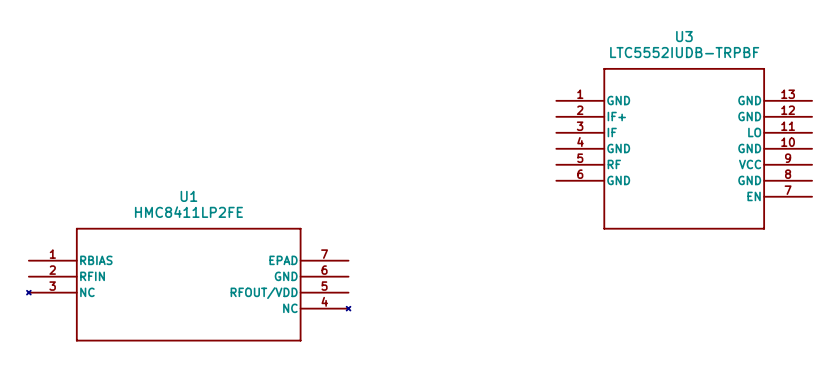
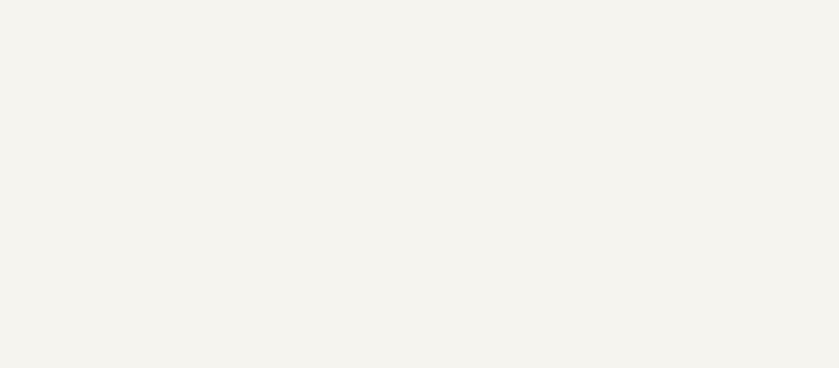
U3: LTC5552IUDB-TRPBF (684, 148) -> none
U1: HMC8411LP2FE (188, 284) -> none

